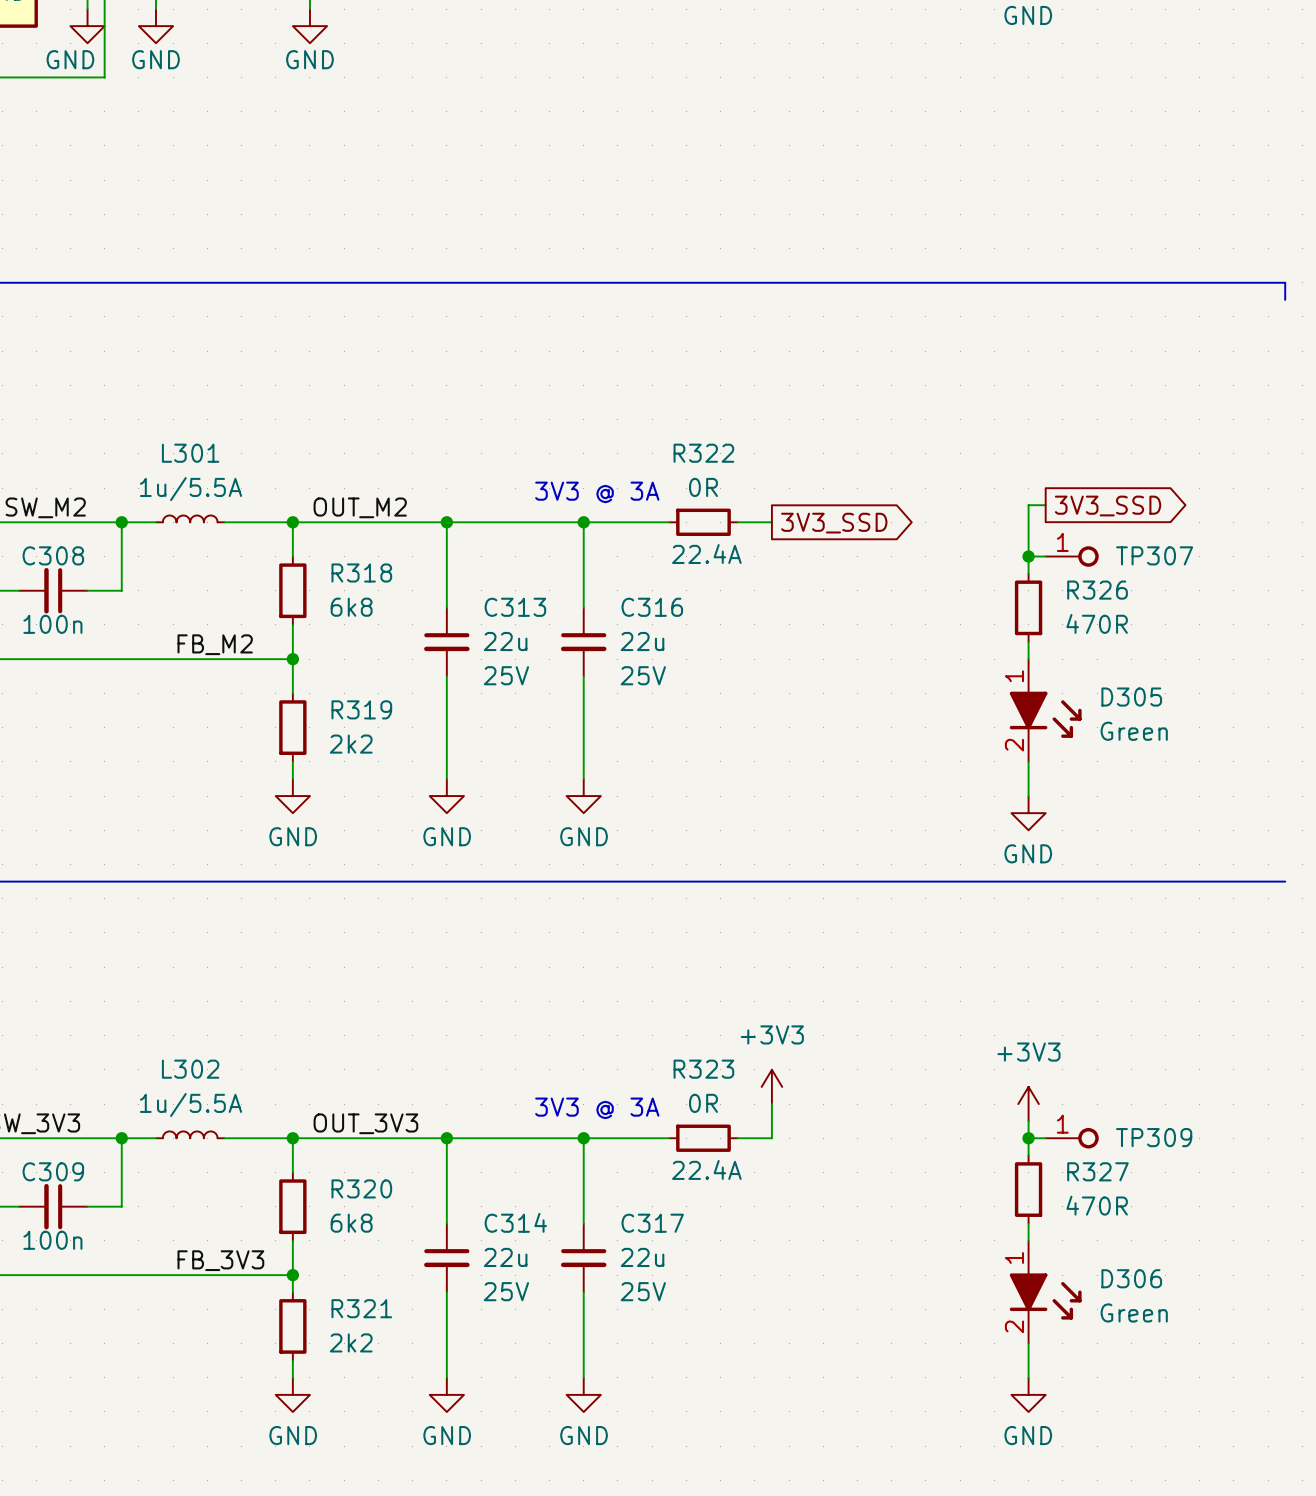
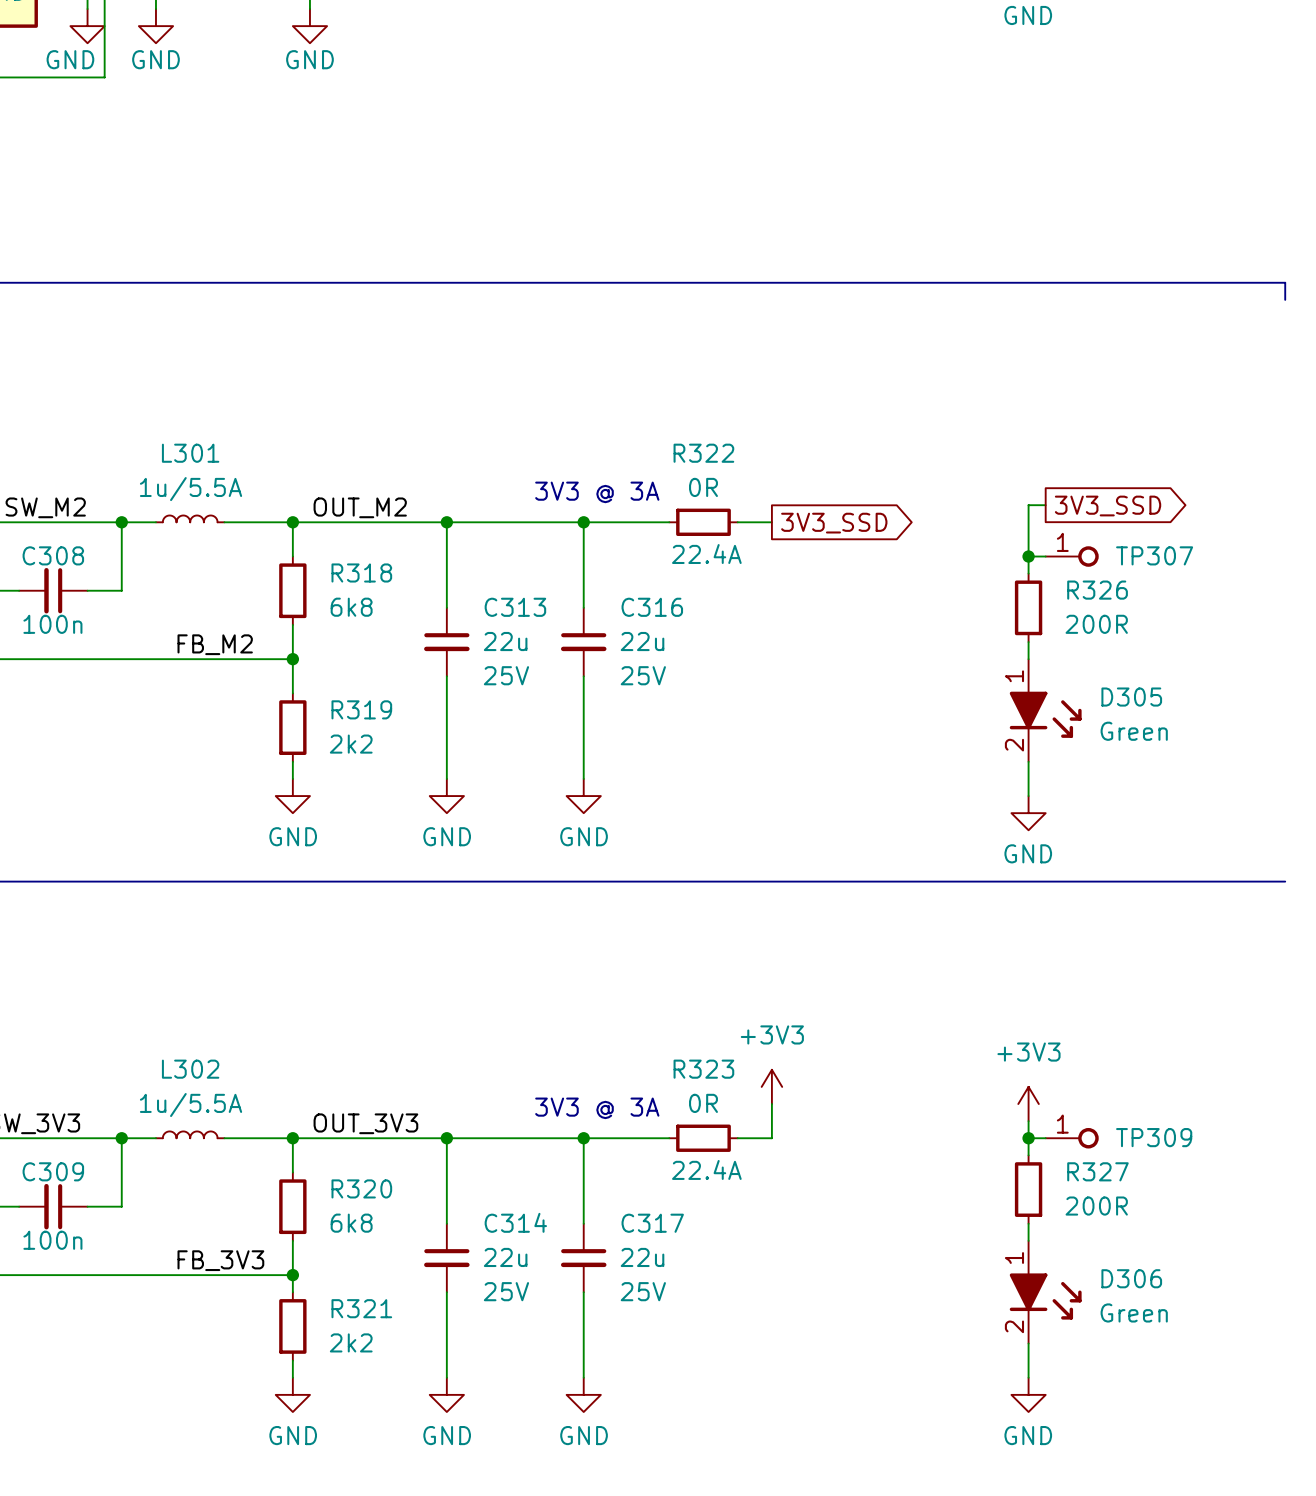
R326 text: 470R (1097, 623) -> 200R (1096, 624)
R327 text: 470R (1097, 1205) -> 200R (1096, 1206)

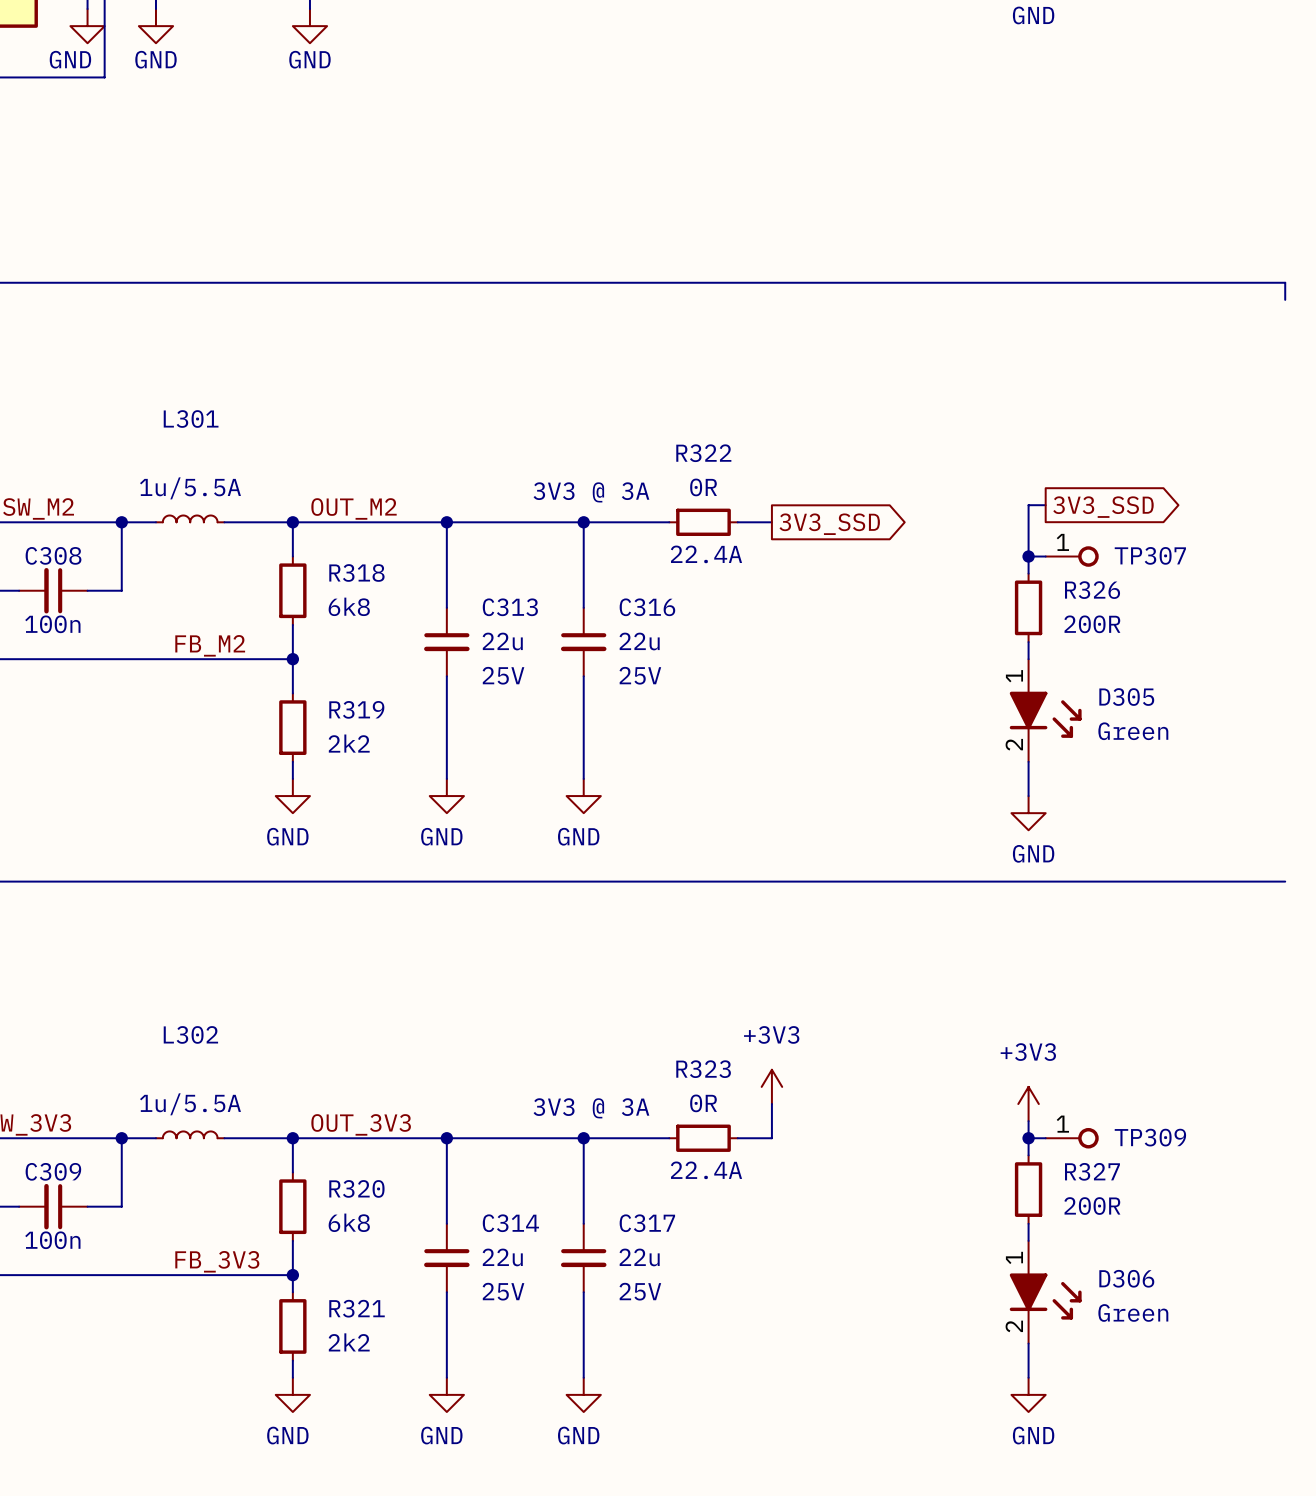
L301 name position: L301 (190, 453) -> L301 (191, 419)
L302 name position: L302 (190, 1069) -> L302 (190, 1034)

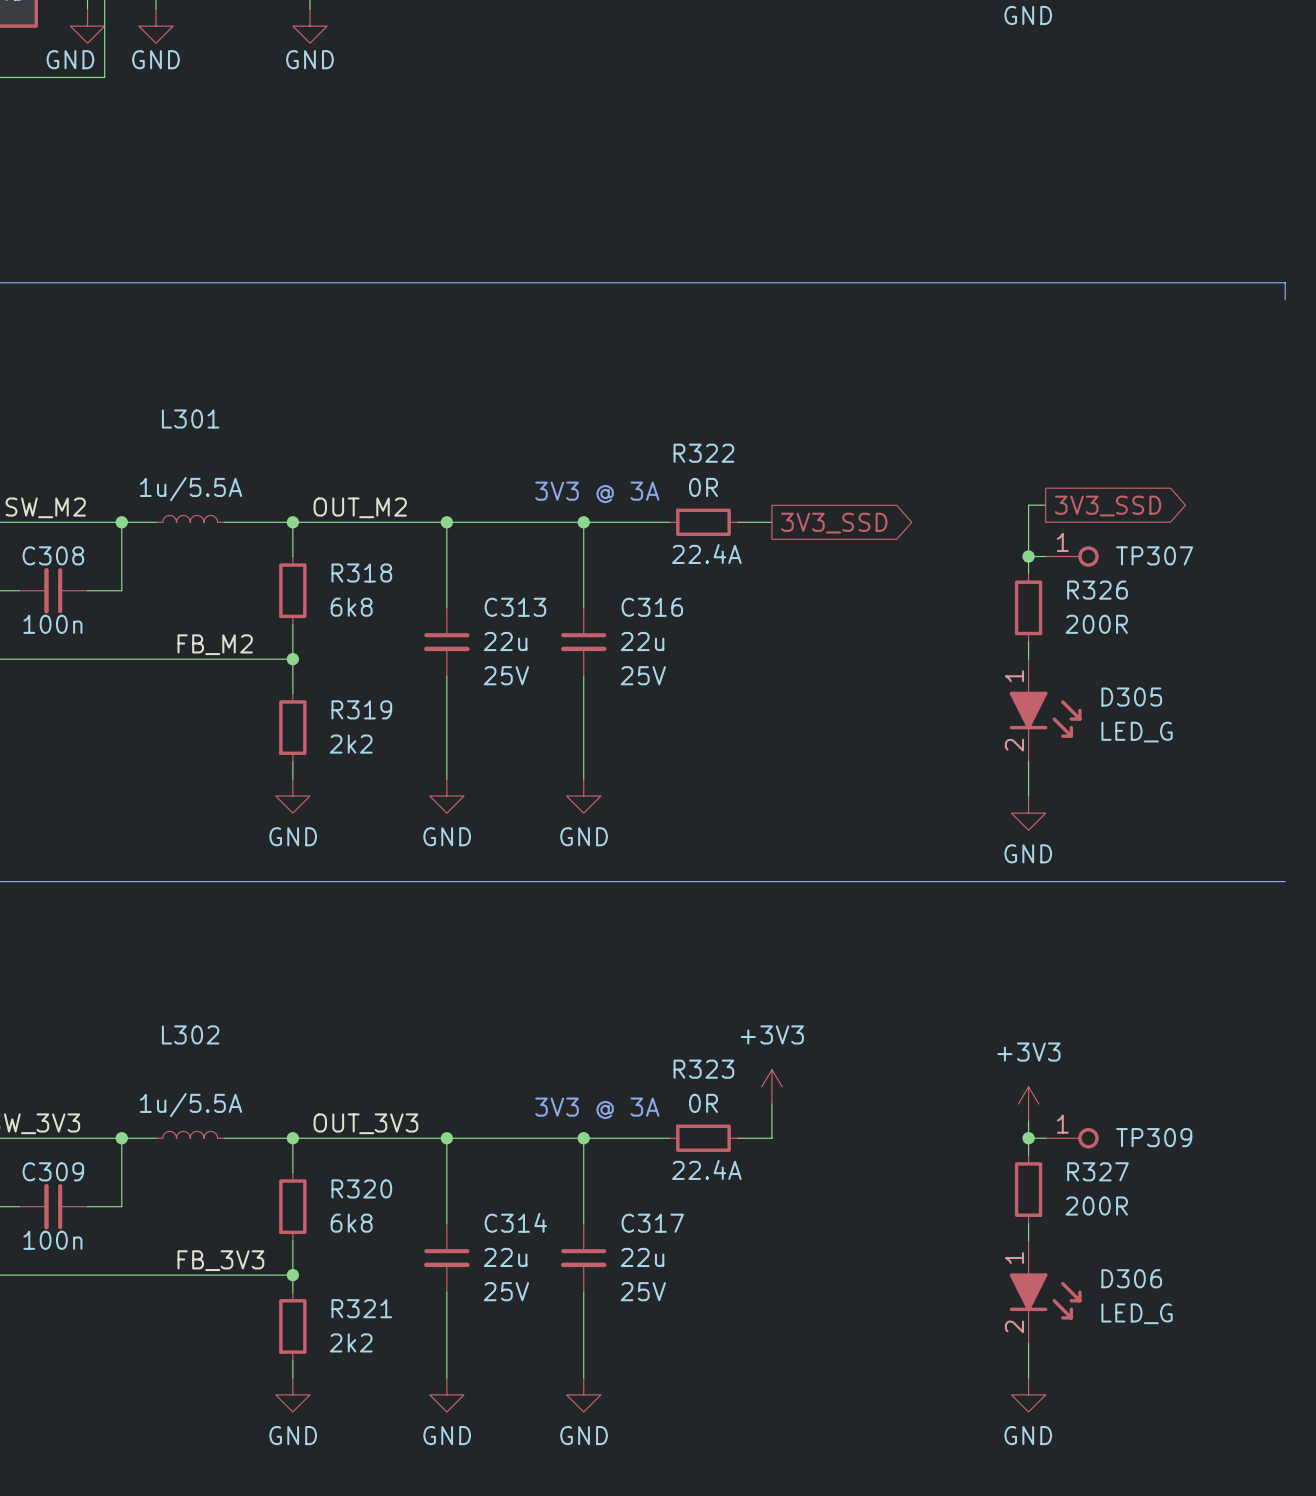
D305 text: Green (1133, 731) -> none
D305 value: none -> LED_G (1137, 732)
D306 text: Green (1133, 1312) -> none
D306 value: none -> LED_G (1137, 1313)

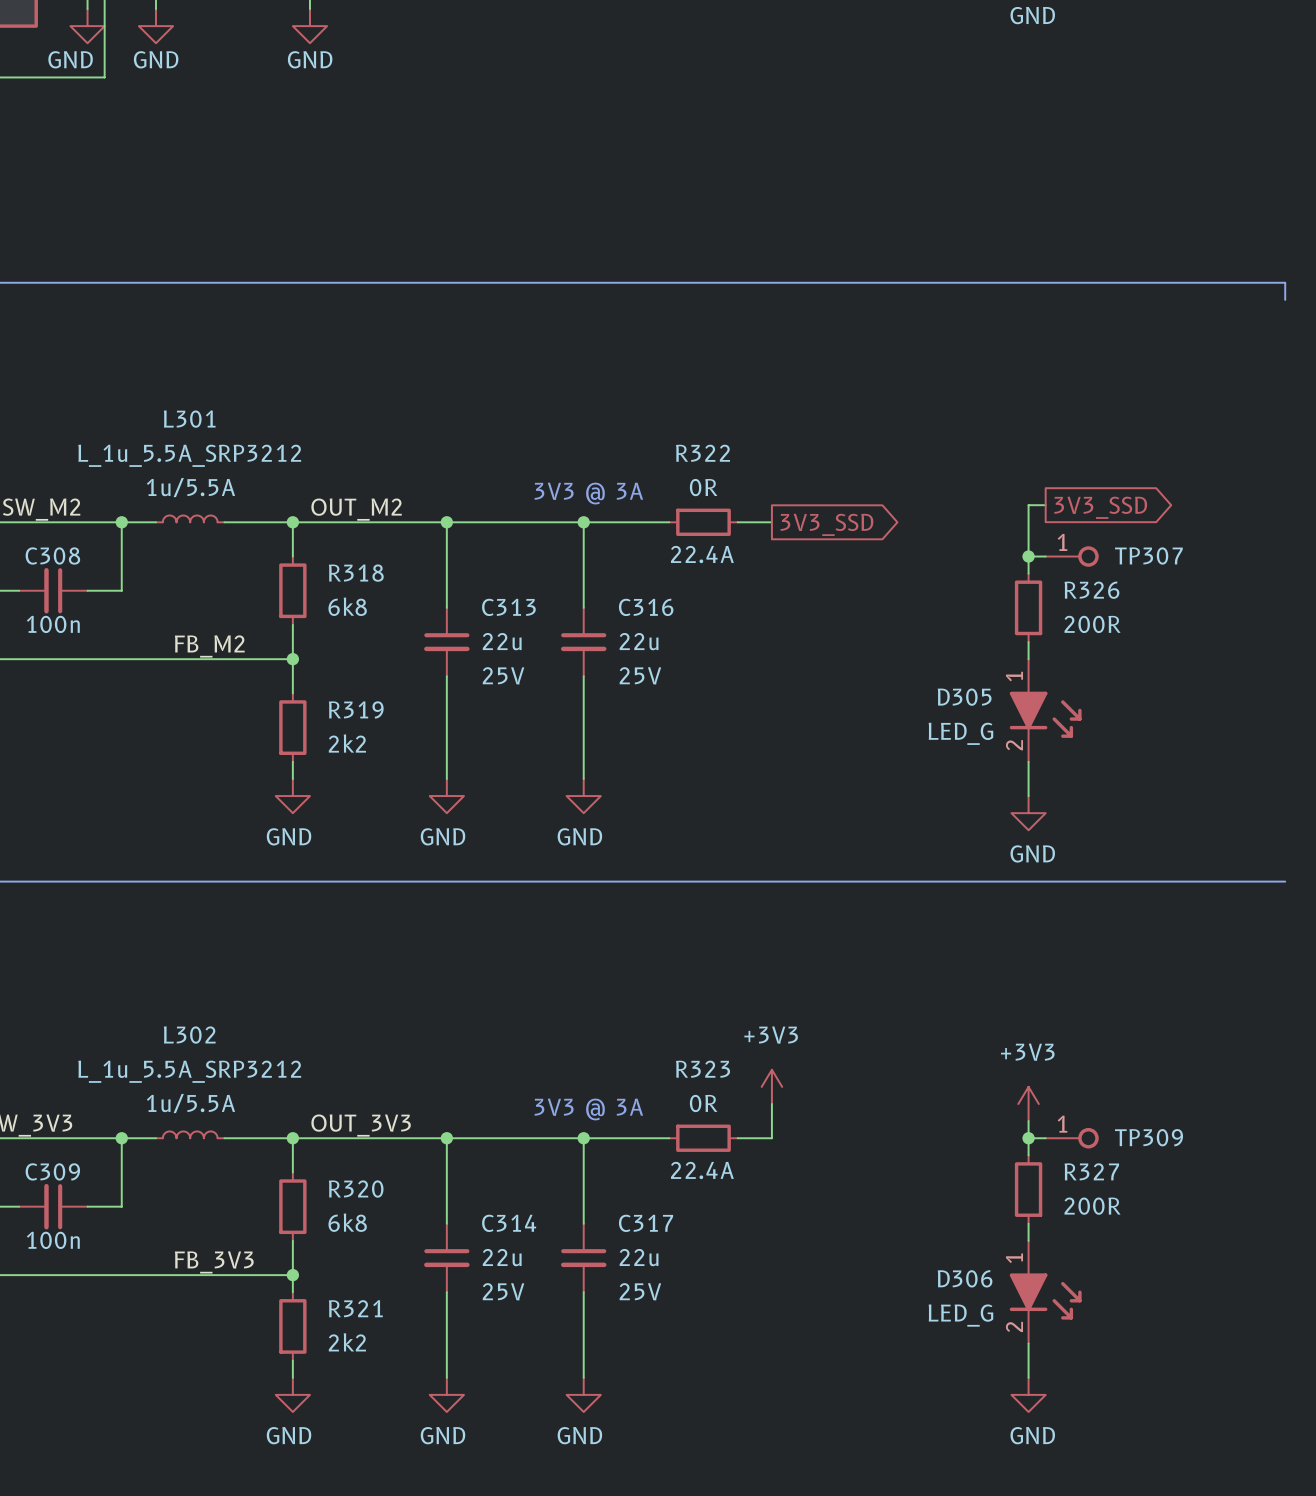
L301 value: none -> L_1u_5.5A_SRP3212 (189, 455)
D305 name position: D305 (1131, 697) -> D305 (964, 697)
D305 value position: LED_G (1137, 732) -> LED_G (960, 733)
L302 value: none -> L_1u_5.5A_SRP3212 (189, 1071)
D306 name position: D306 (1131, 1278) -> D306 (965, 1278)
D306 value position: LED_G (1137, 1313) -> LED_G (960, 1315)

